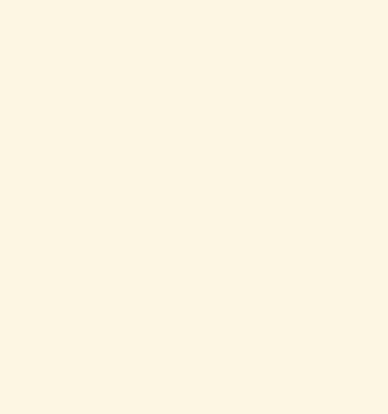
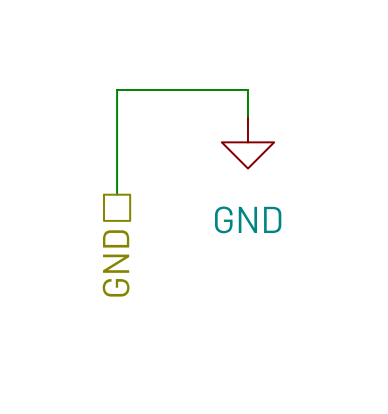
wire: none -> (247, 116) (247, 89) (117, 89) (117, 194)
power symbol: none -> GND (247, 142)
hierarchical label: none -> GND (116, 263)

